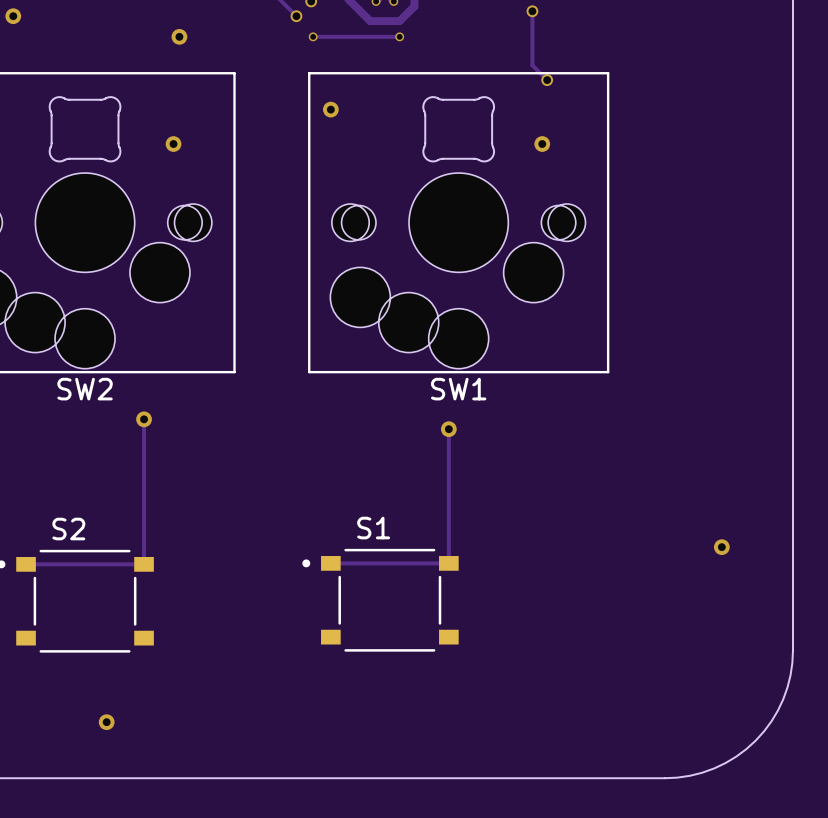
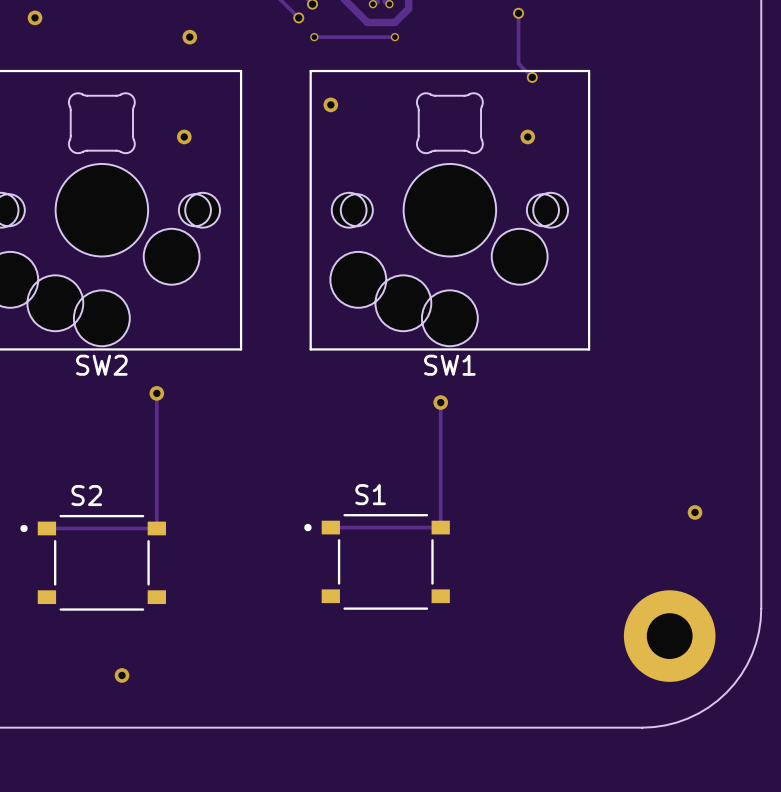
part: none -> (669, 636)

